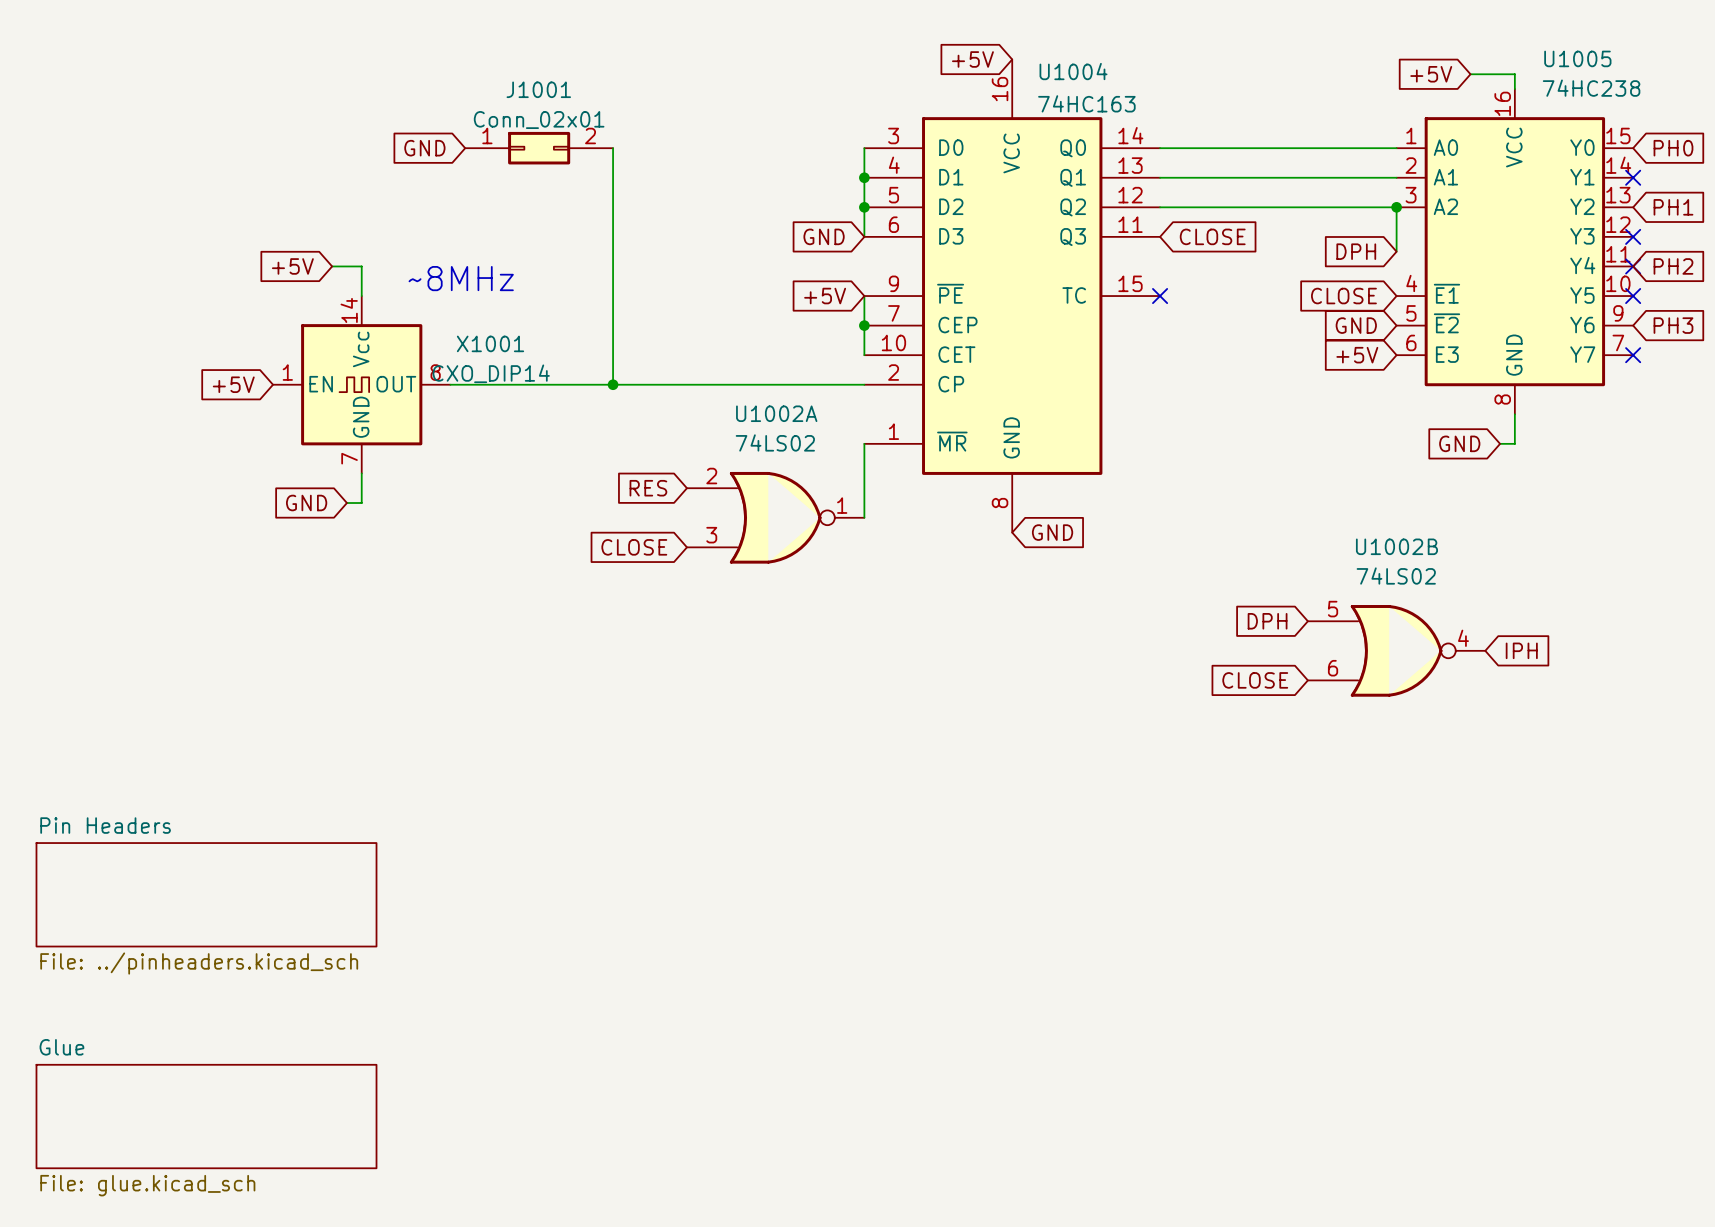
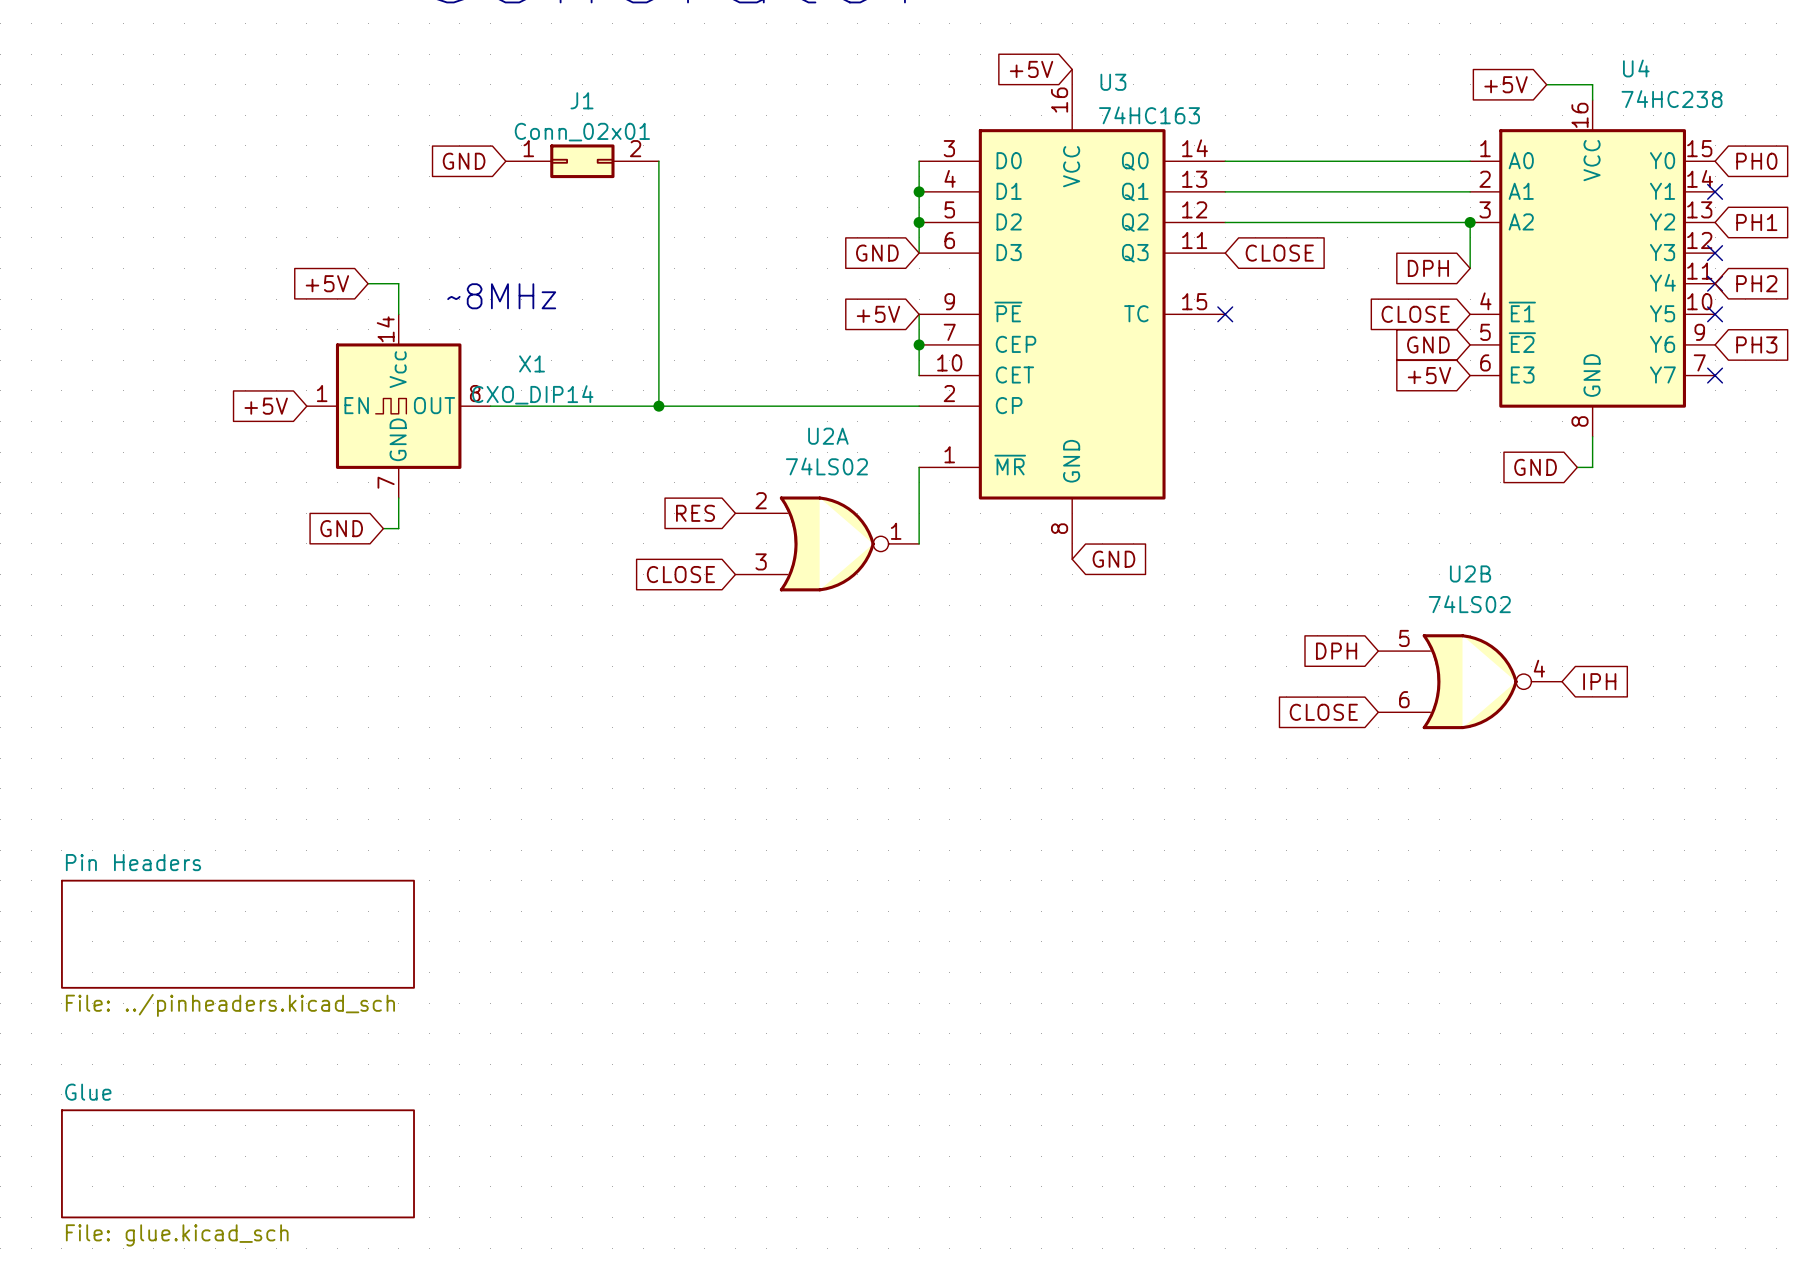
U1005 name: U1005 (1577, 58) -> U4 (1636, 68)
U1004 name: U1004 (1073, 71) -> U3 (1113, 82)
J1001 name: J1001 (538, 89) -> J1 (582, 100)
X1001 name: X1001 (490, 343) -> X1 (532, 363)
U1002A name: U1002A (776, 413) -> U2A (828, 436)
U1002B name: U1002B (1396, 546) -> U2B (1470, 573)

